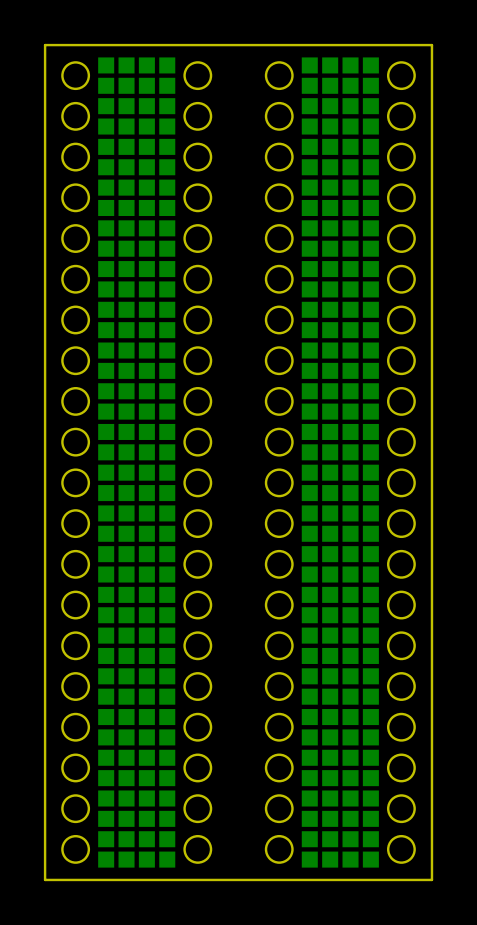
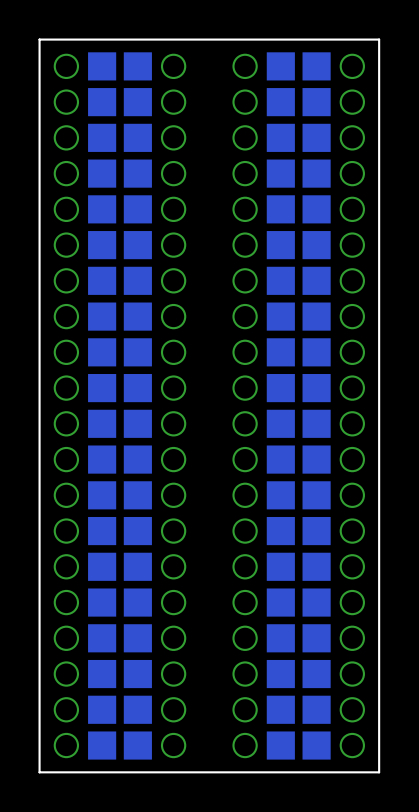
part footprint: [98, 57, 176, 135] -> [88, 52, 152, 117]
part footprint: [301, 57, 379, 135] -> [266, 52, 331, 117]
part footprint: [98, 138, 176, 217] -> [88, 123, 152, 188]
part footprint: [301, 138, 379, 217] -> [266, 123, 331, 188]
part footprint: [98, 220, 176, 298] -> [88, 195, 152, 260]
part footprint: [301, 220, 379, 298] -> [266, 195, 331, 260]
part footprint: [98, 301, 176, 379] -> [88, 266, 152, 331]
part footprint: [301, 301, 379, 379] -> [266, 266, 331, 331]
part footprint: [98, 383, 176, 461] -> [88, 338, 152, 403]
part footprint: [301, 383, 379, 461] -> [266, 338, 331, 403]
part footprint: [98, 464, 176, 542] -> [88, 409, 152, 474]
part footprint: [301, 464, 379, 542] -> [266, 409, 331, 474]
part footprint: [98, 546, 176, 624] -> [88, 481, 152, 546]
part footprint: [301, 546, 379, 624] -> [266, 481, 331, 546]
part footprint: [98, 627, 176, 705] -> [88, 552, 152, 617]
part footprint: [301, 627, 379, 705] -> [266, 552, 331, 617]
part footprint: [98, 709, 176, 787] -> [88, 624, 152, 689]
part footprint: [301, 709, 379, 787] -> [266, 624, 331, 689]
part footprint: [98, 790, 176, 868] -> [88, 695, 152, 760]
part footprint: [301, 790, 379, 868] -> [266, 695, 331, 760]

